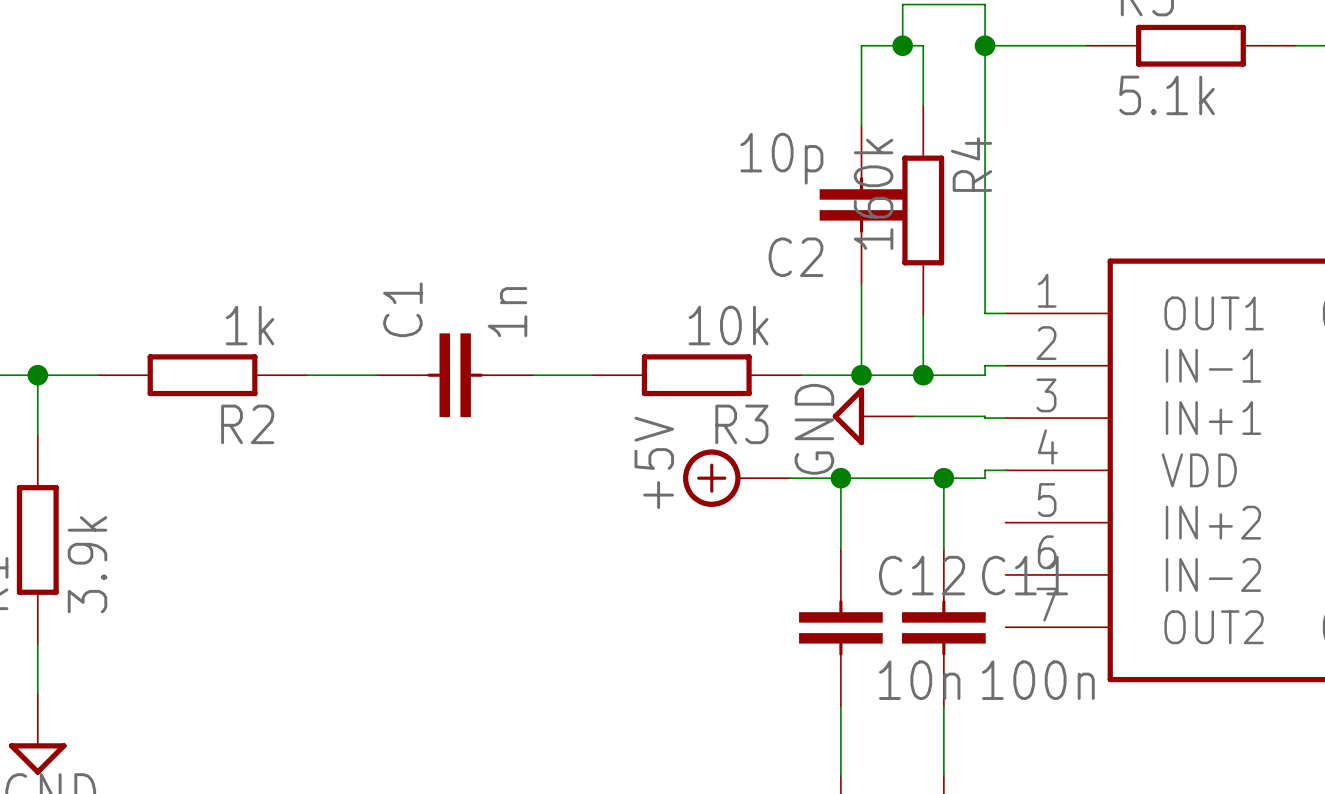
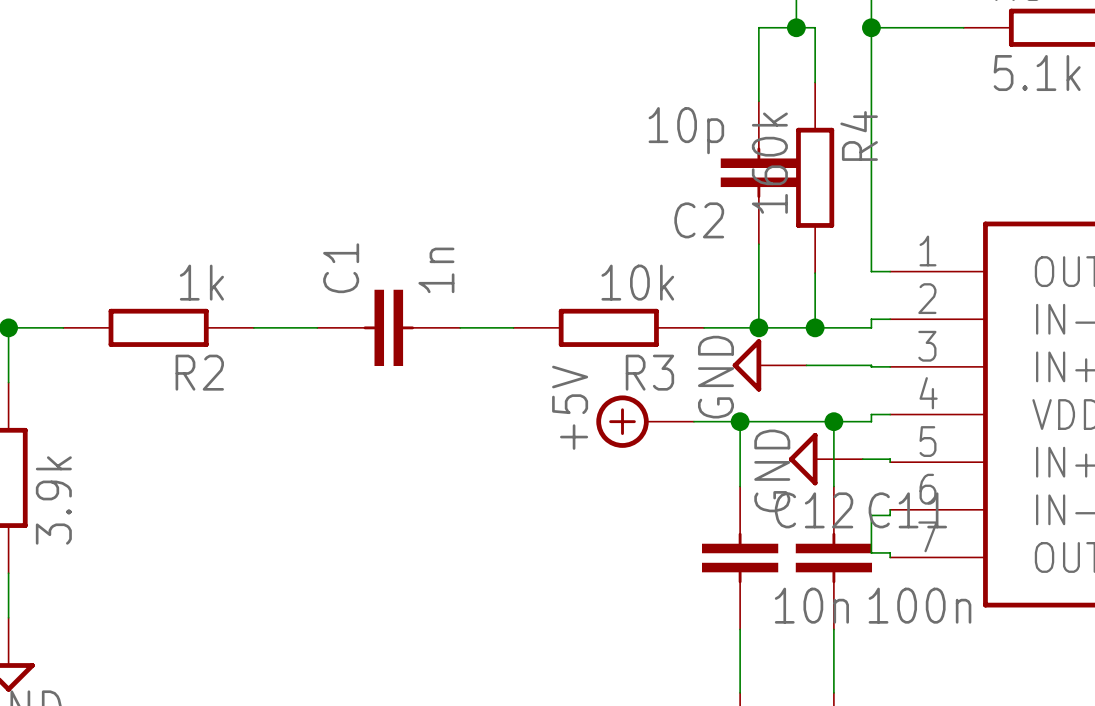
power symbol: none -> GND (825, 459)
wire: none -> (862, 459) (890, 459) (890, 462)
wire: none -> (890, 509) (890, 515) (871, 515) (871, 552) (890, 552) (890, 557)

